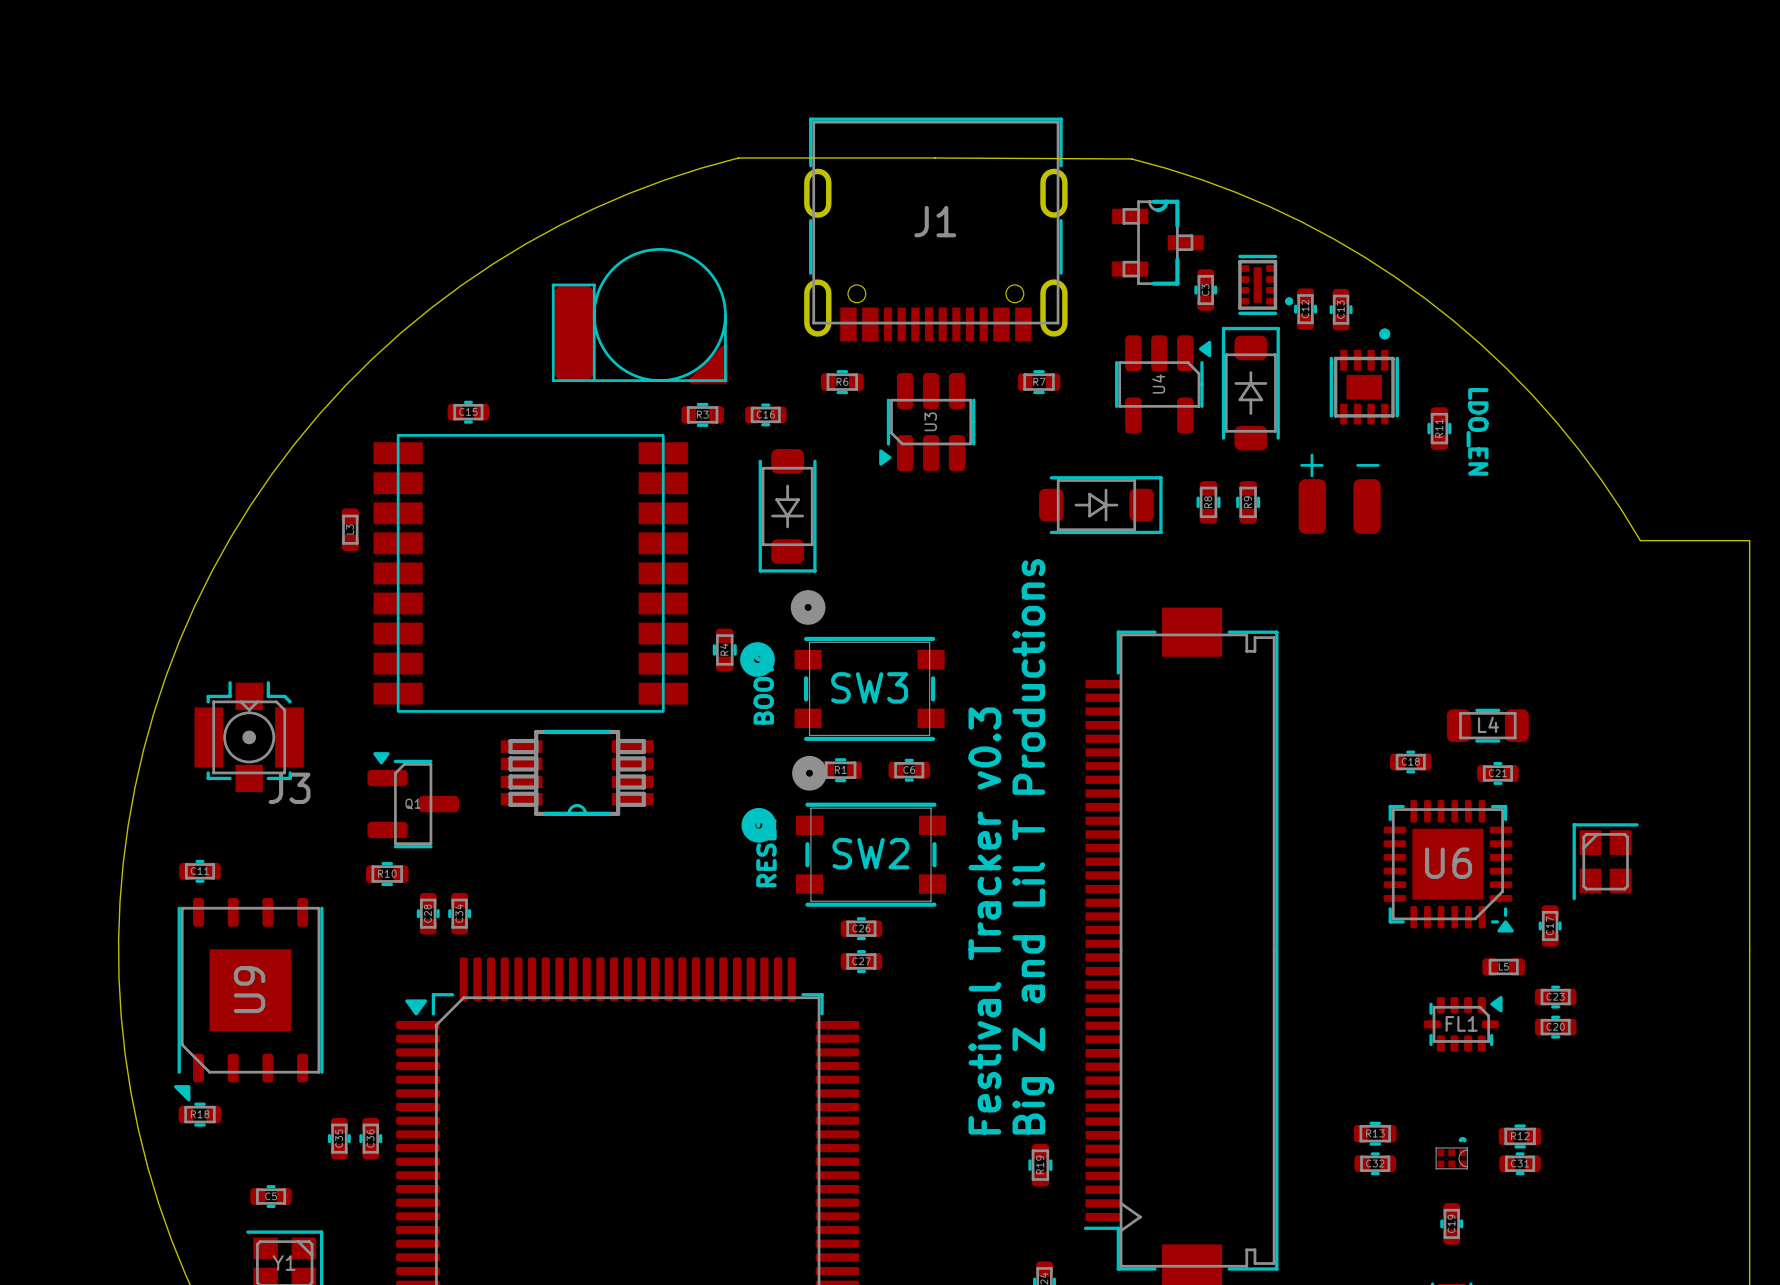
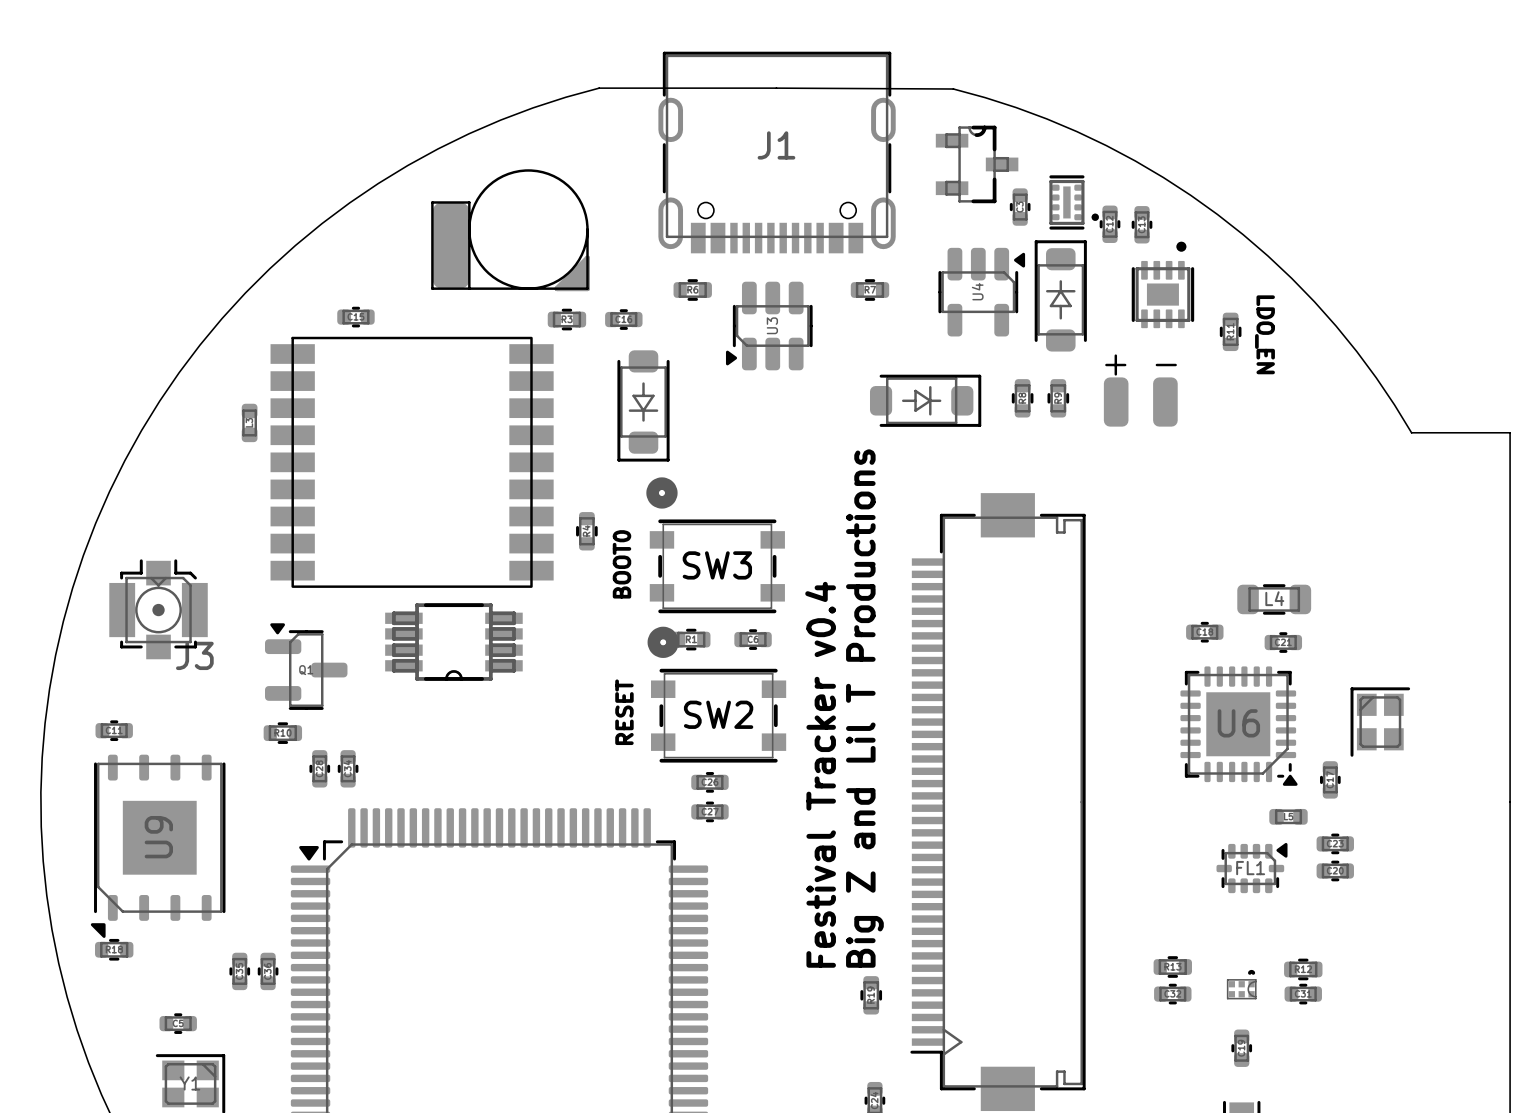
SW3 footprint: [740, 590, 945, 741] -> [646, 477, 785, 614]
SW2 footprint: [741, 755, 947, 907] -> [647, 626, 787, 763]
text: Festival Tracker v0.3 (984, 920) -> Festival Tracker v0.4 (820, 774)

